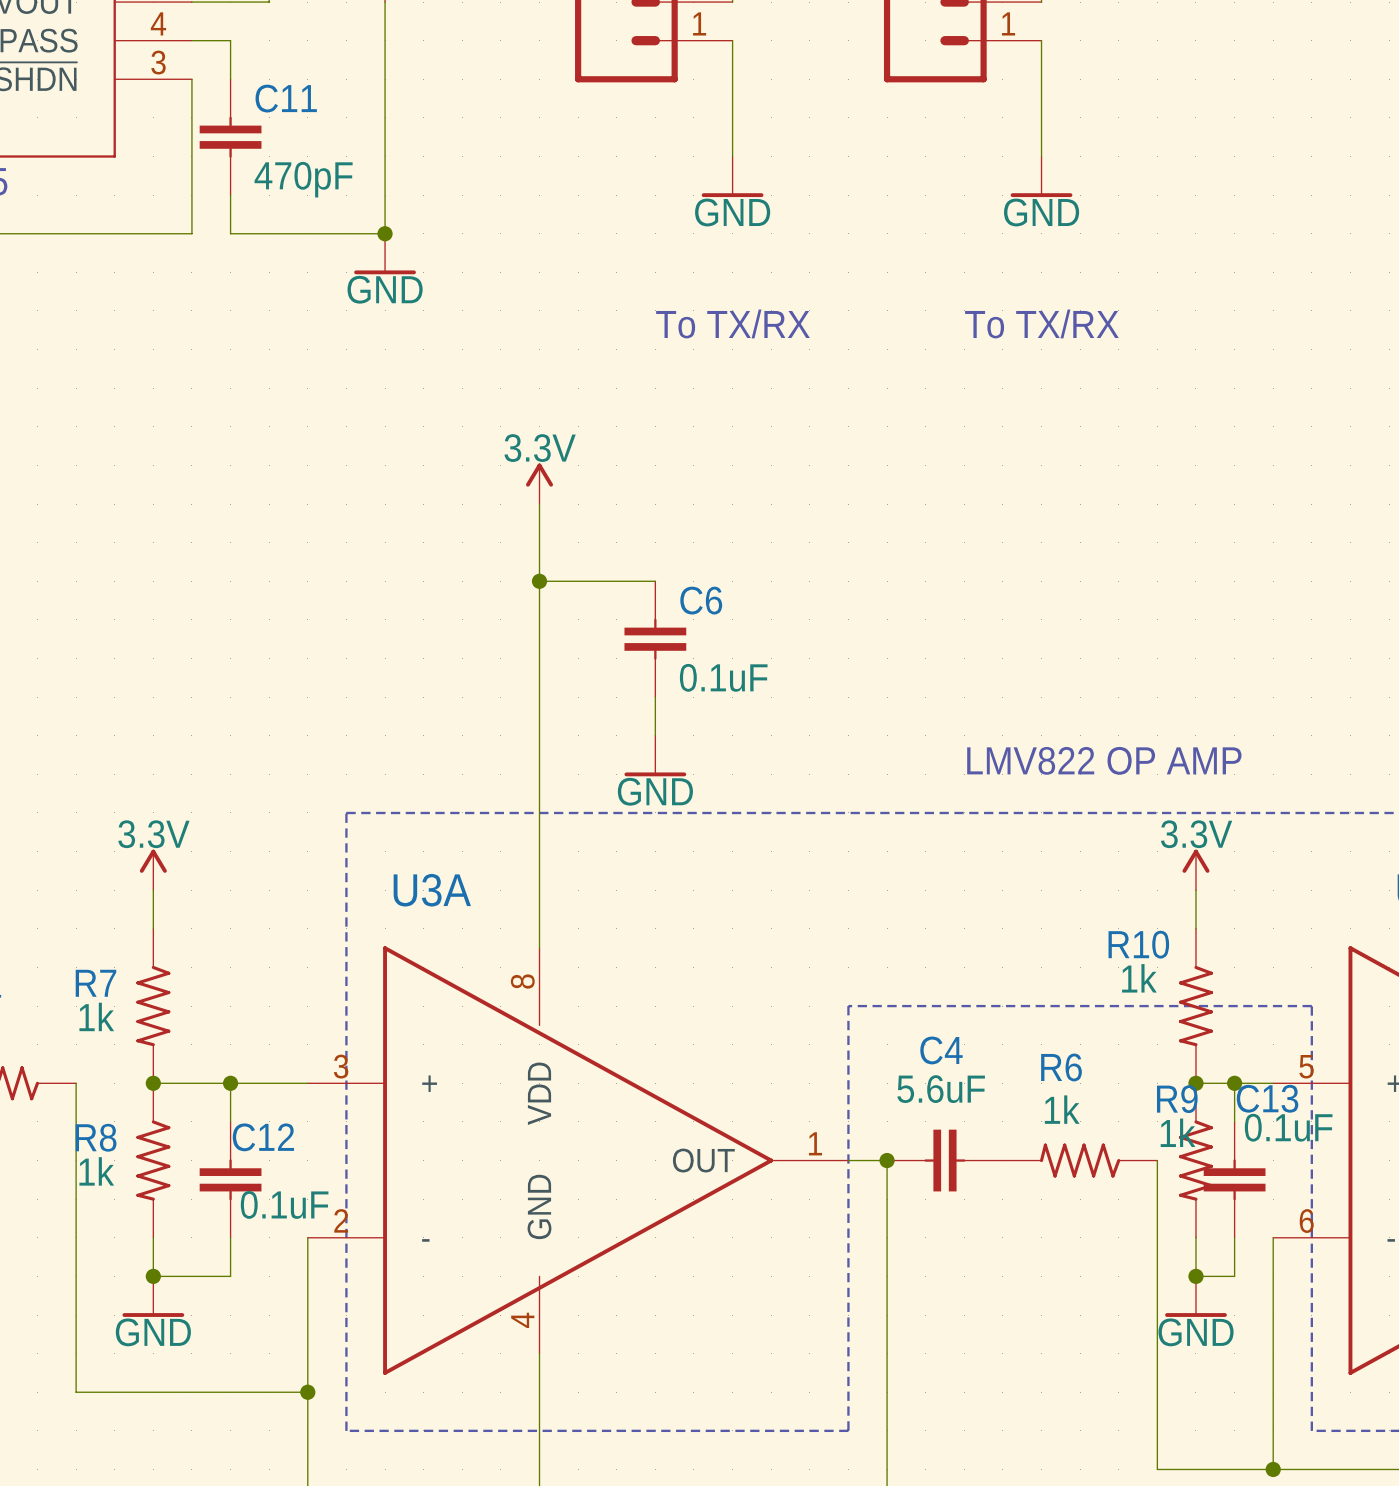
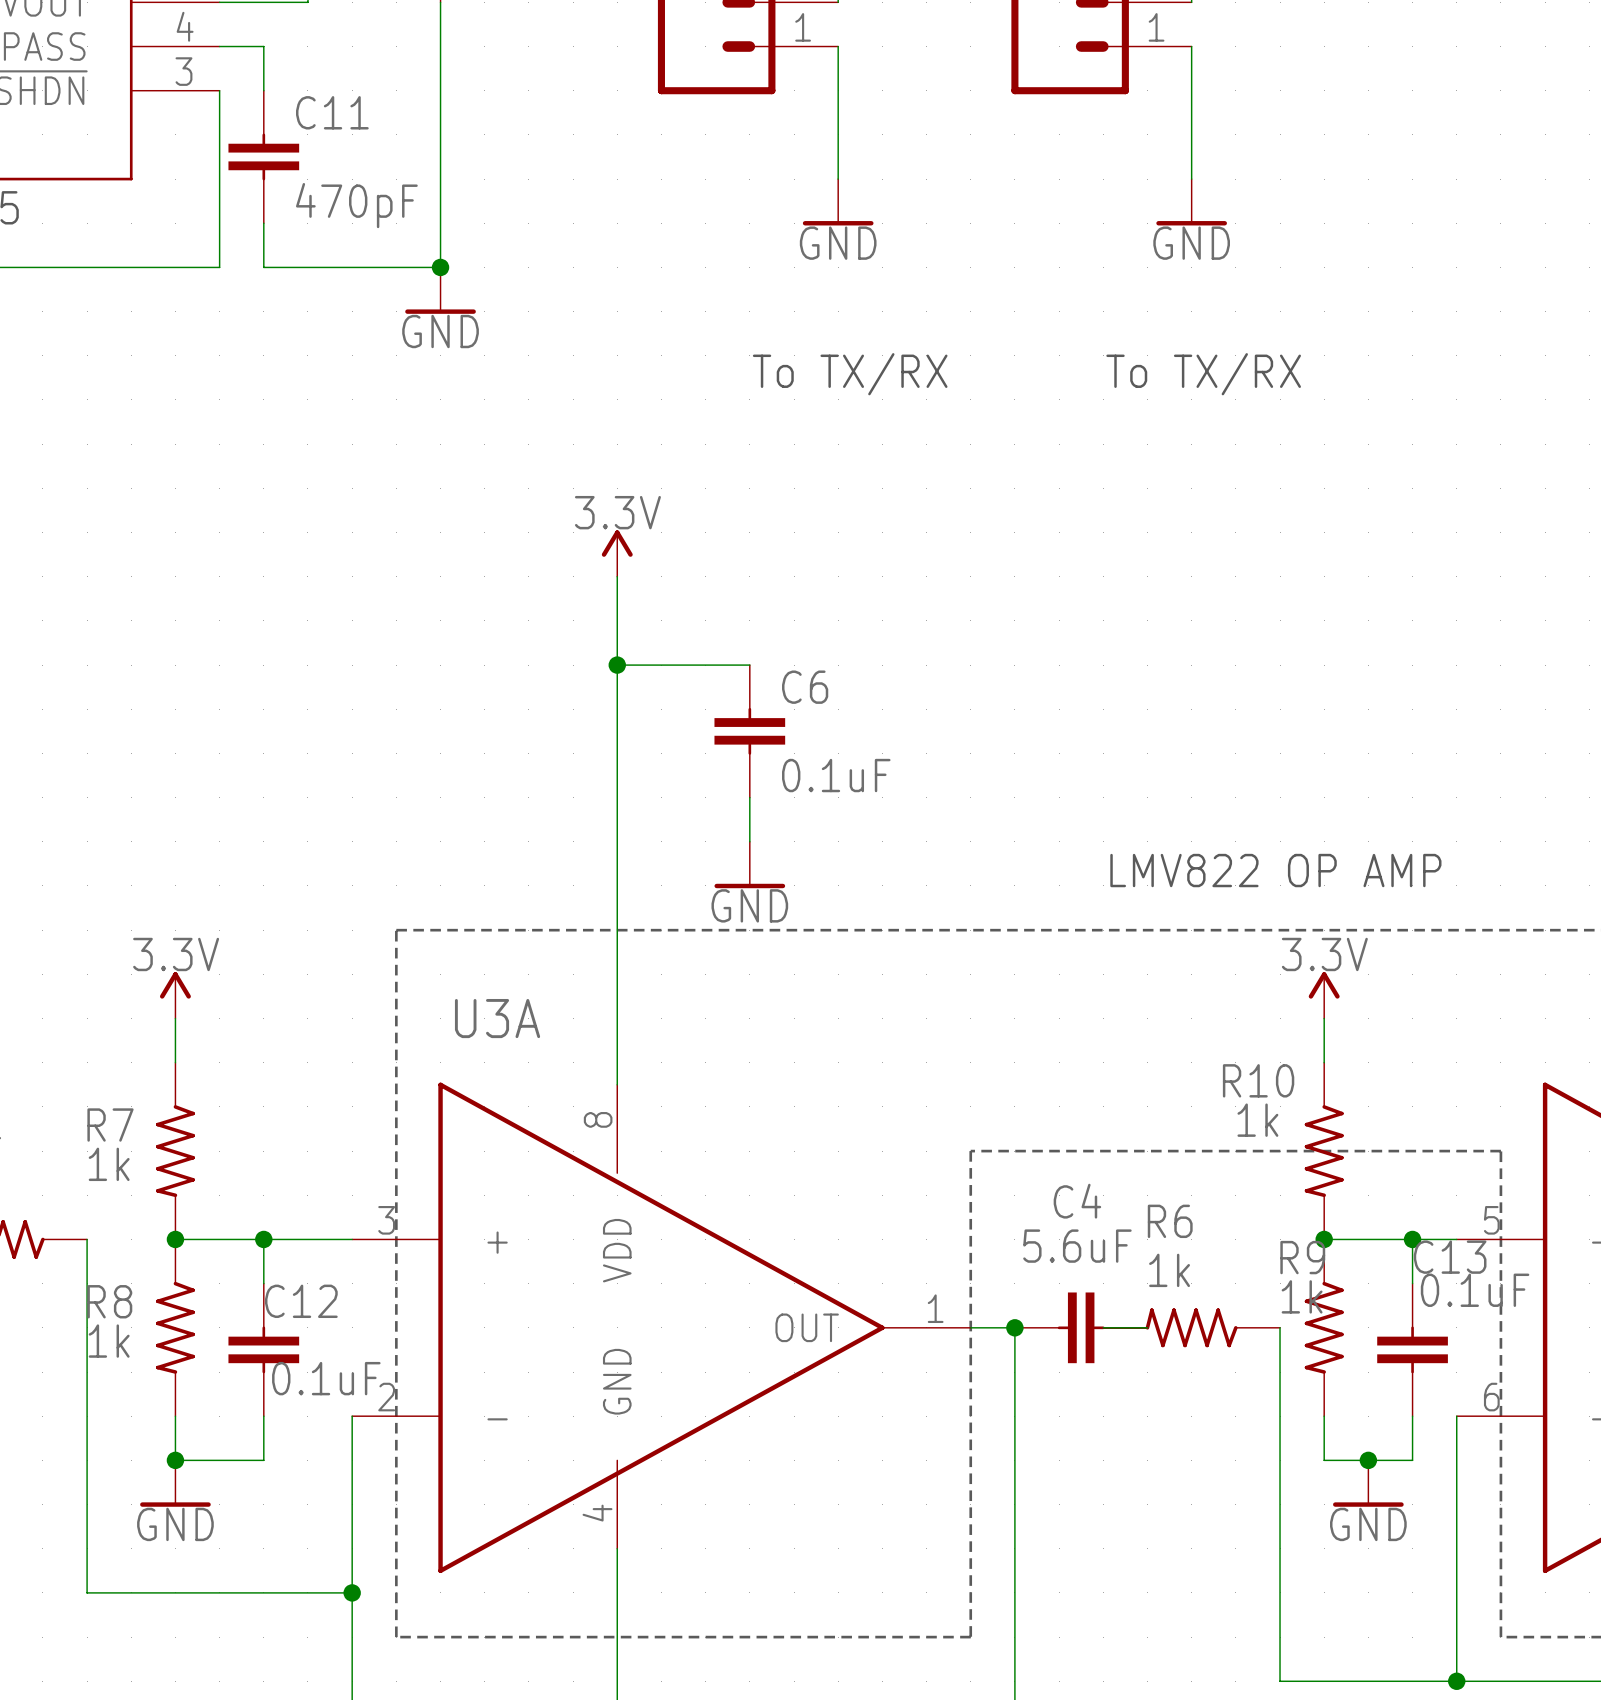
power symbol position: 3.3V (1195, 869) -> 3.3V (1324, 995)
wire: (1195, 890) (1195, 928) -> (1324, 1018) (1324, 1062)
R10 position: (1195, 1006) -> (1324, 1151)
wire: none -> (1324, 1239) (1368, 1239)
junction position: (1195, 1083) -> (1324, 1239)
R6 position: (1080, 1160) -> (1191, 1327)
R9 position: (1195, 1160) -> (1324, 1327)
wire: (1195, 1237) (1195, 1276) -> (1324, 1460) (1368, 1460)
wire: (1157, 1276) (1157, 1469) -> (1280, 1327) (1280, 1681) (1324, 1681)

